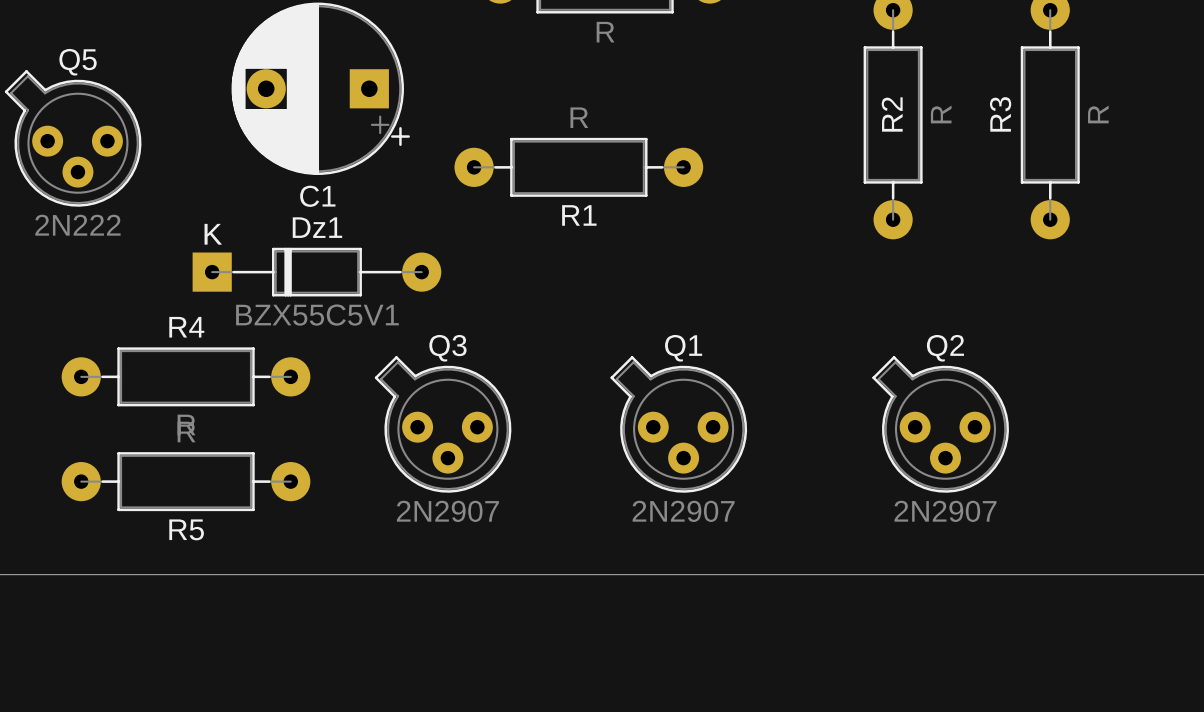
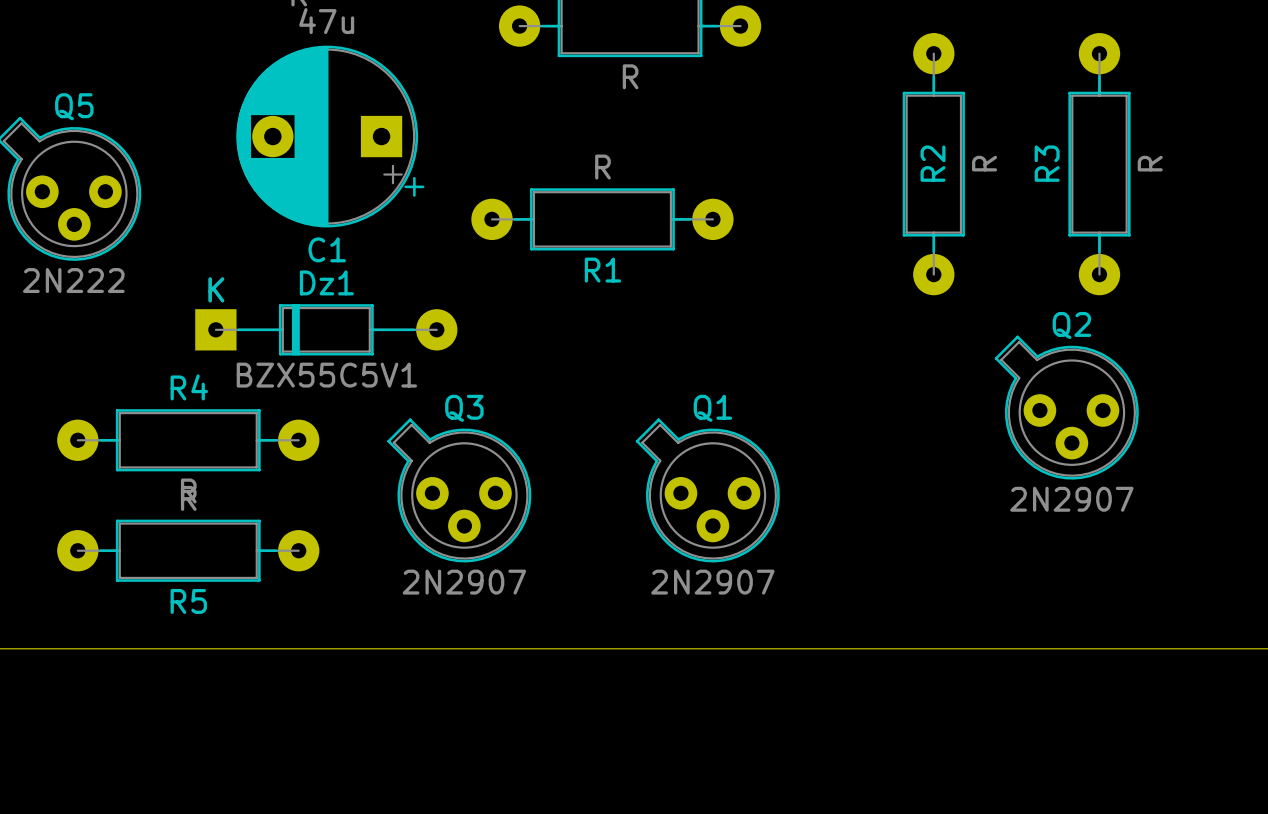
Q2 position: (940, 424) -> (1066, 407)

